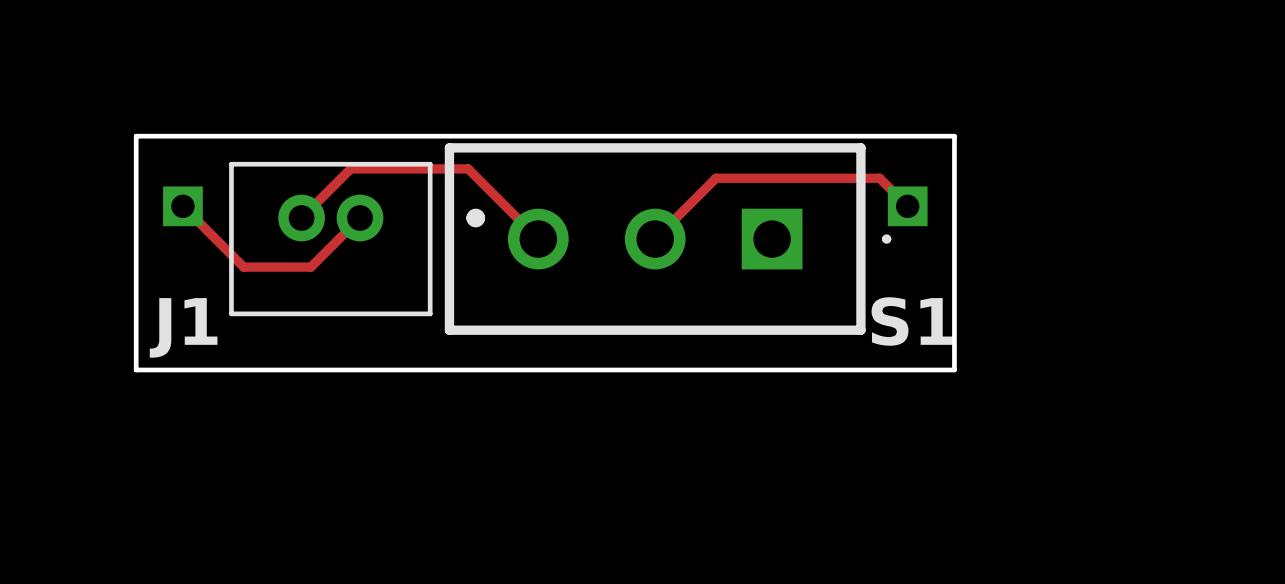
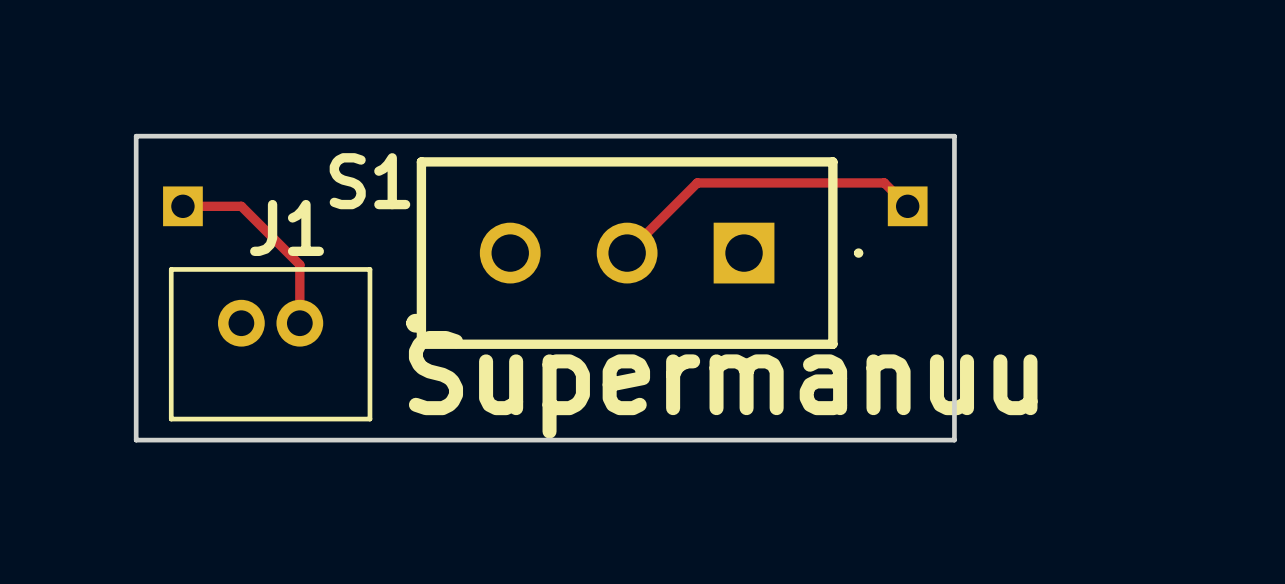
track: (884, 182) (879, 178) (715, 178) (655, 239) -> (884, 182) (697, 182) (627, 253)
track: (182, 206) (243, 267) (310, 267) (360, 218) -> (182, 206) (241, 206) (299, 264) (299, 323)
track: (301, 218) (350, 168) (468, 168) (538, 239) -> none
J1 position: (357, 239) -> (296, 344)
S1 position: (668, 239) -> (640, 253)
S1 name position: S1 (912, 321) -> S1 (369, 181)
J1 name position: J1 (183, 327) -> J1 (287, 227)
board edge: (136, 369) (954, 369) -> (136, 369) (136, 440) (954, 440) (954, 369)
text: none -> Supermanuu (723, 384)

